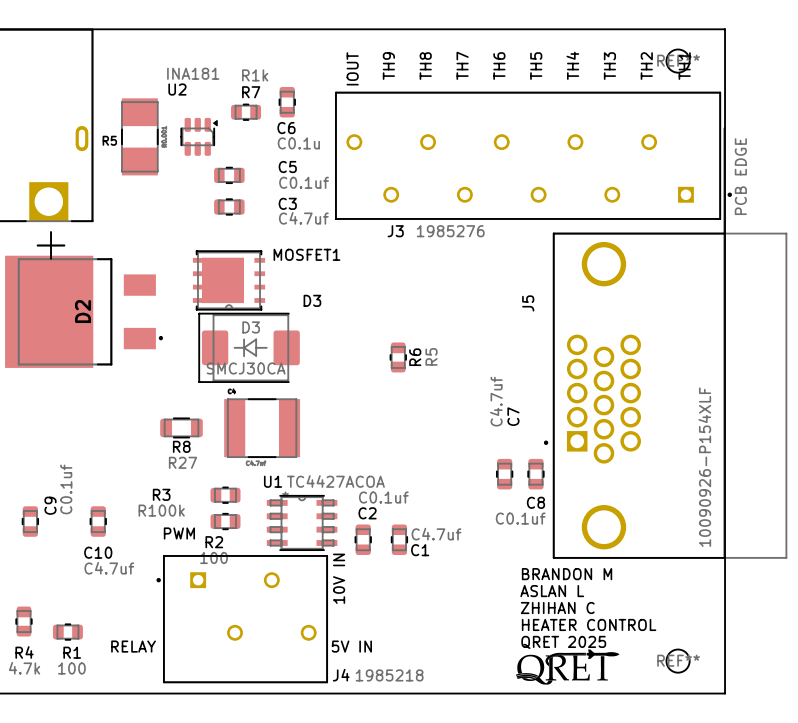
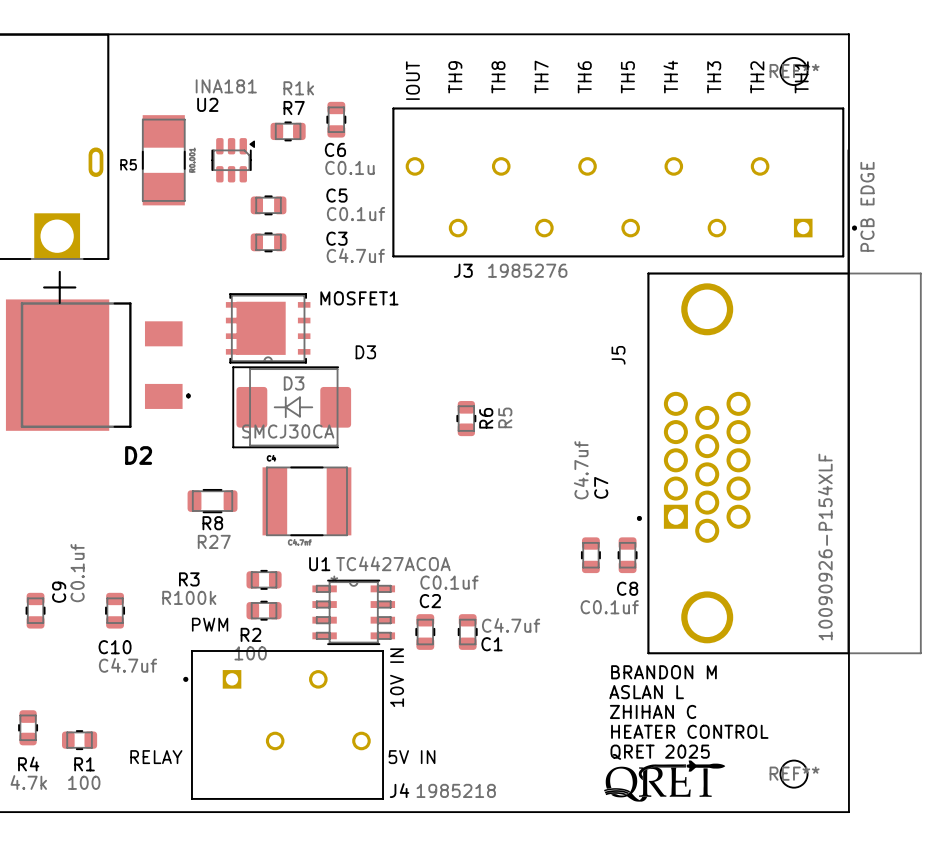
D2 name rotation: 0° (83, 311) -> 90° clockwise (138, 455)
D2 name position: D2 (83, 311) -> D2 (138, 455)

